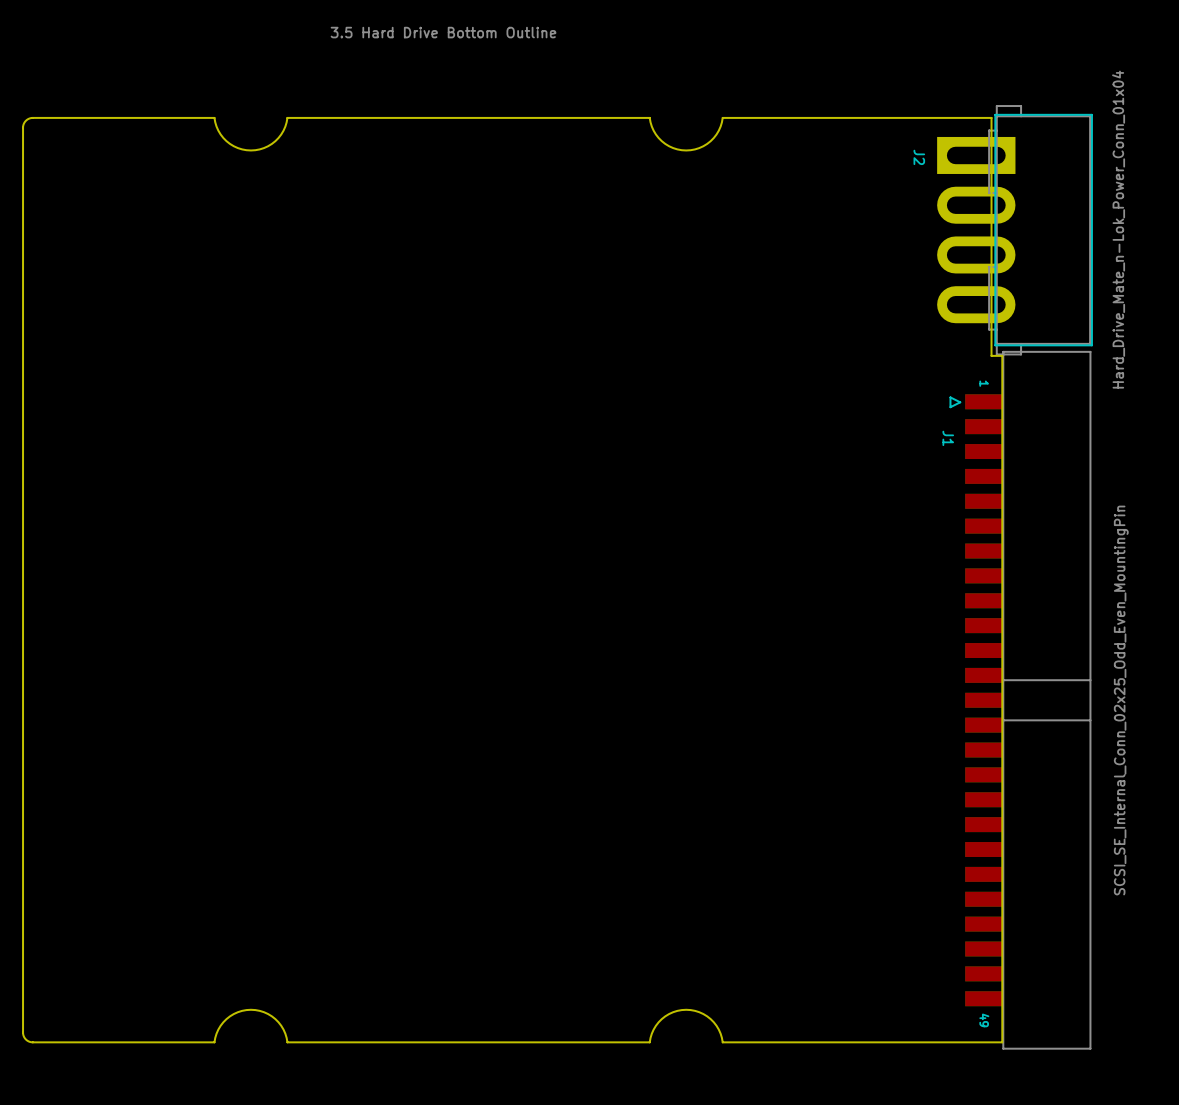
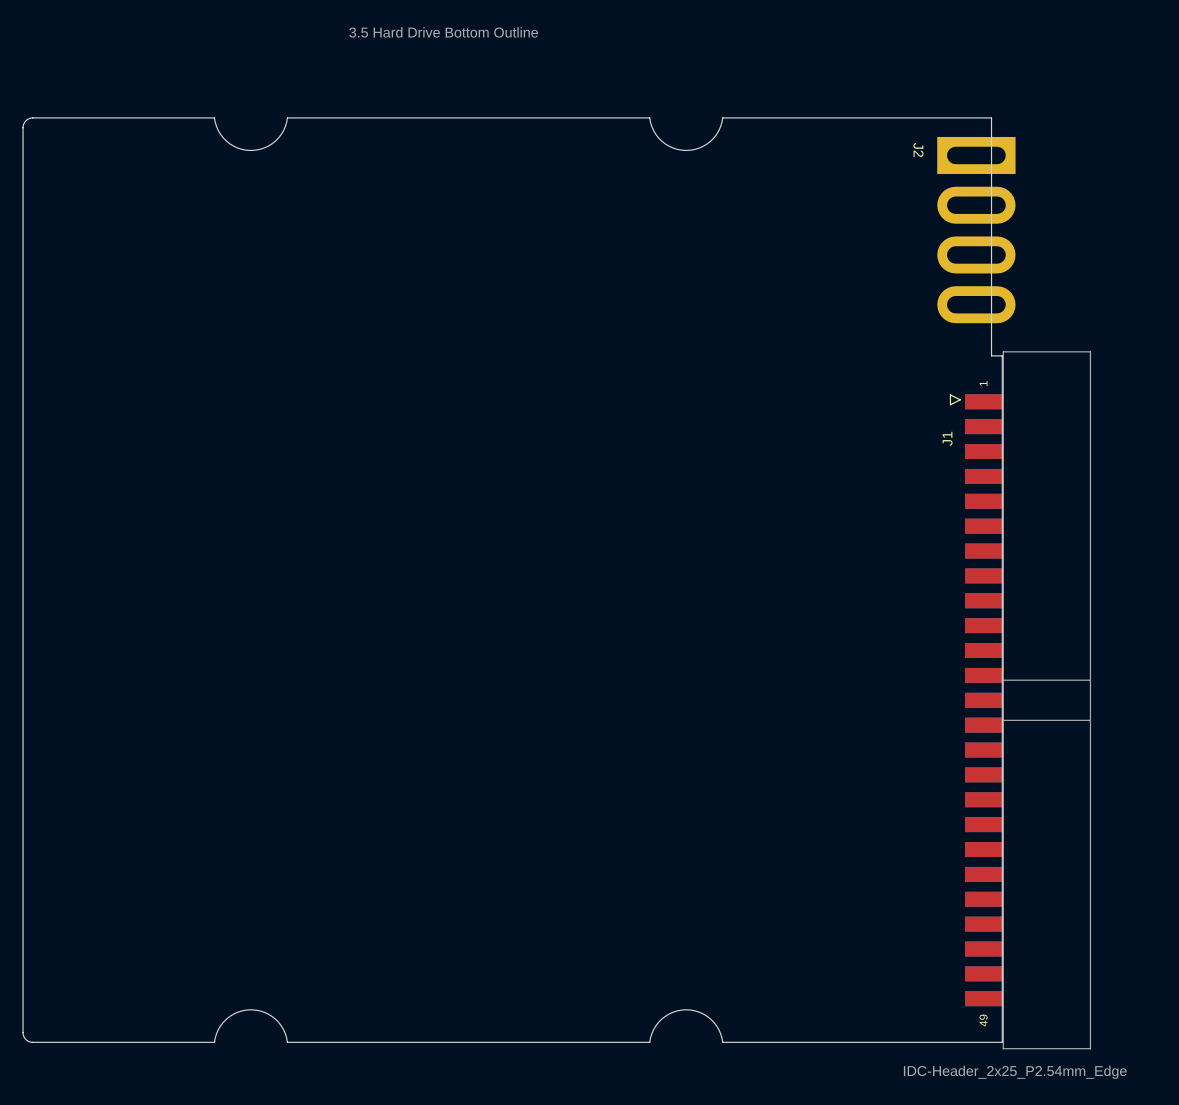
J2 side: top (1014, 230) -> bottom (976, 230)
J1 footprint: [949, 351, 1091, 1050] -> [949, 351, 1091, 1050]
J1 value: SCSI_SE_Internal_Conn_02x25_Odd_Even_MountingPin (1121, 700) -> IDC-Header_2x25_P2.54mm_Edge (1015, 1072)

